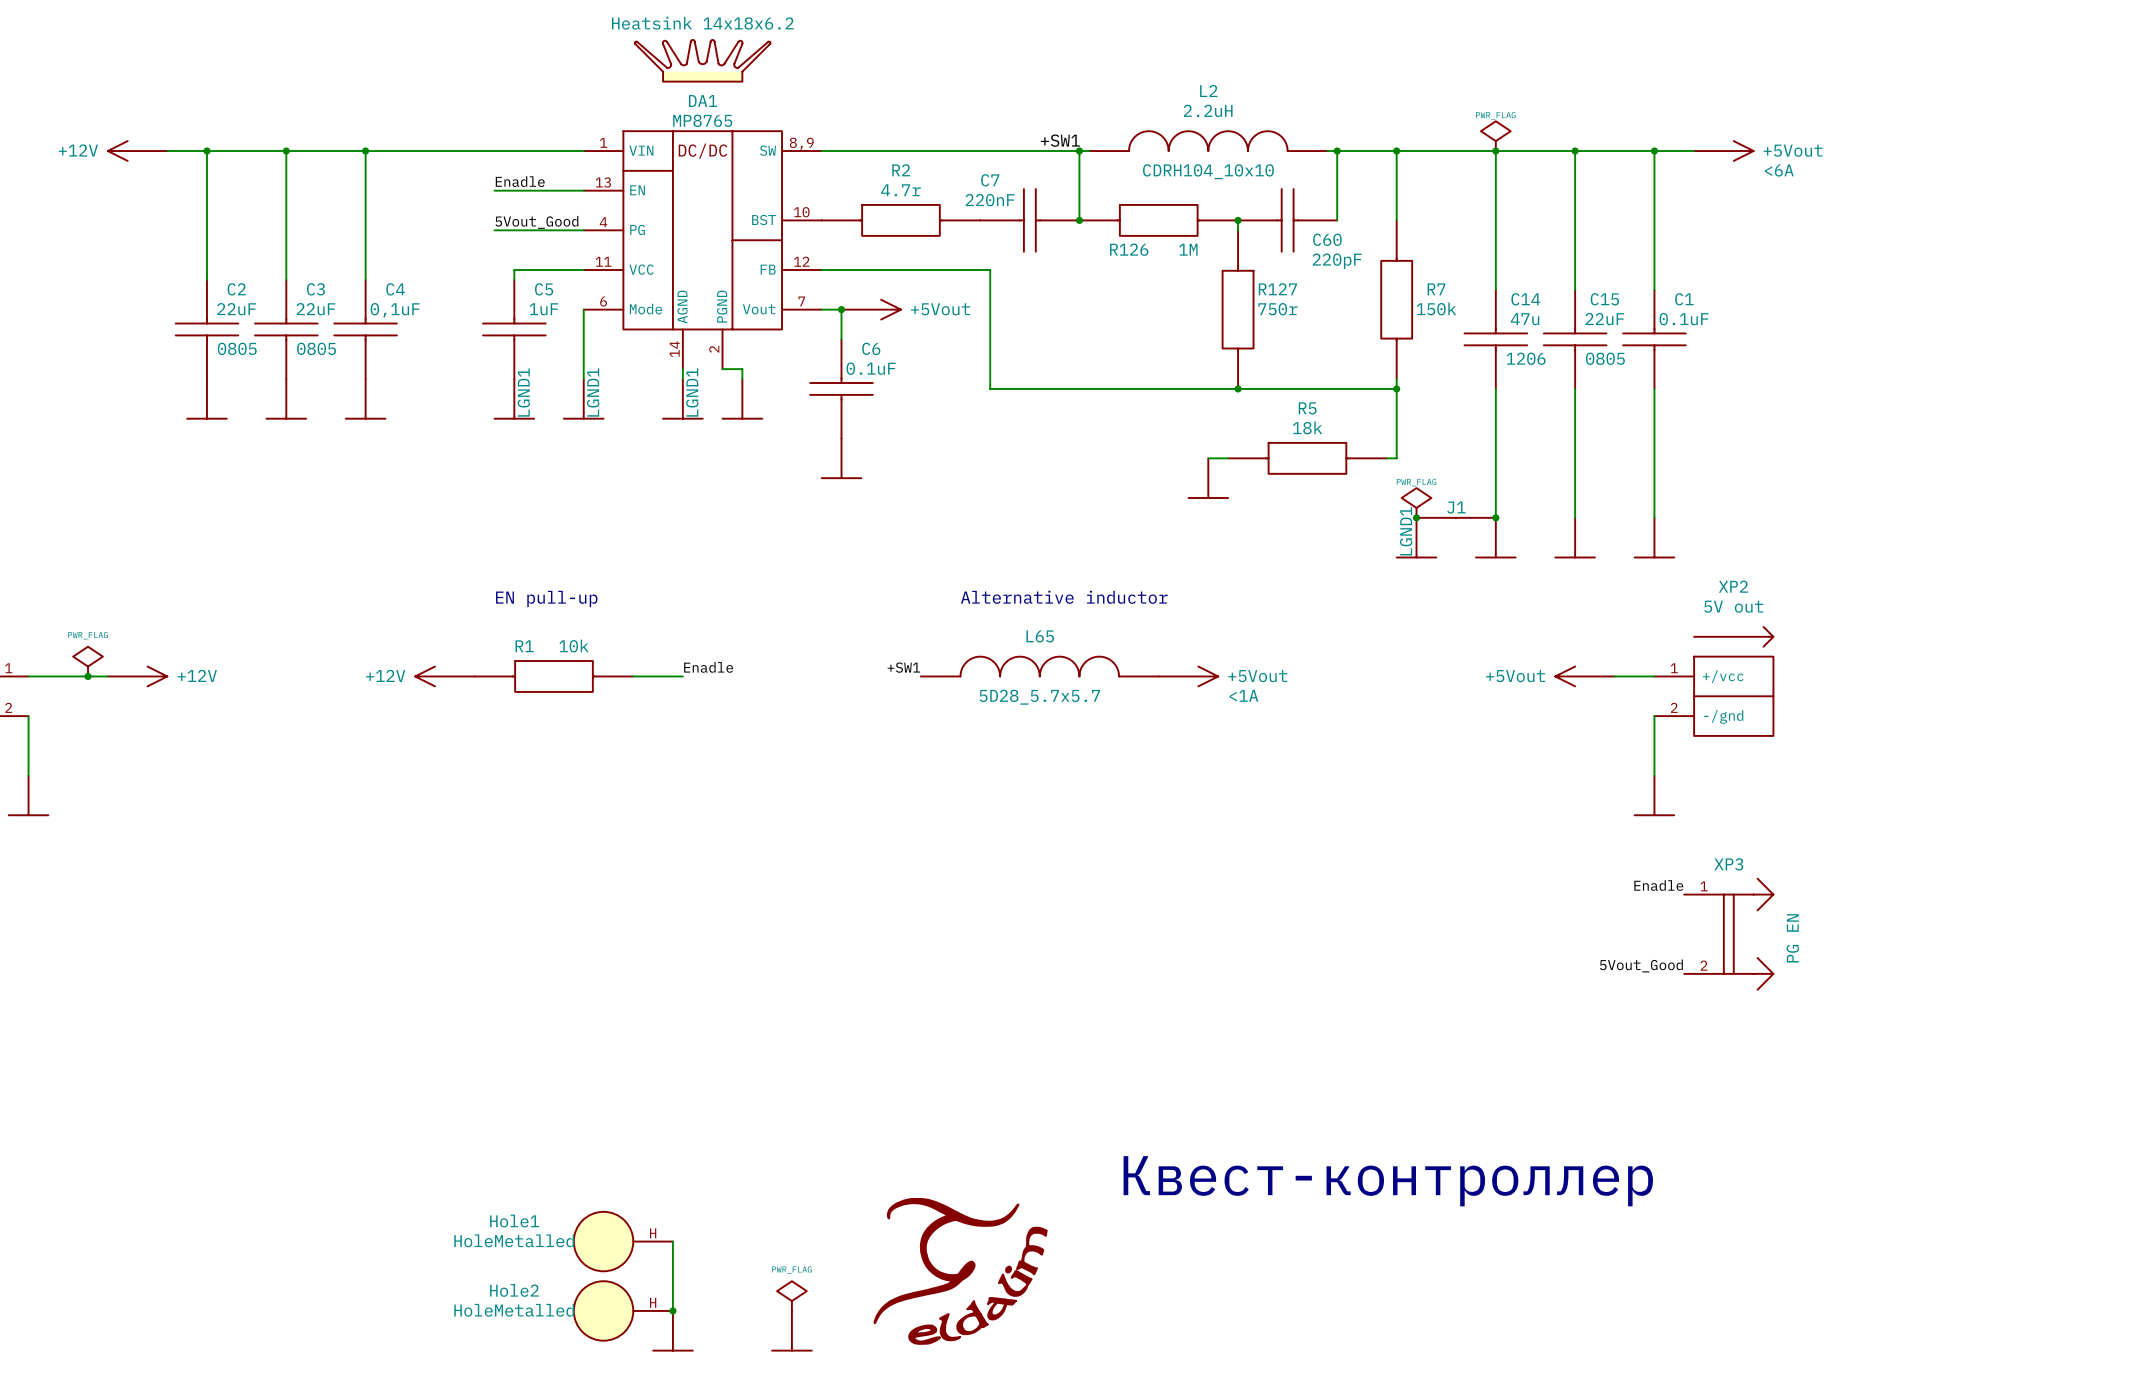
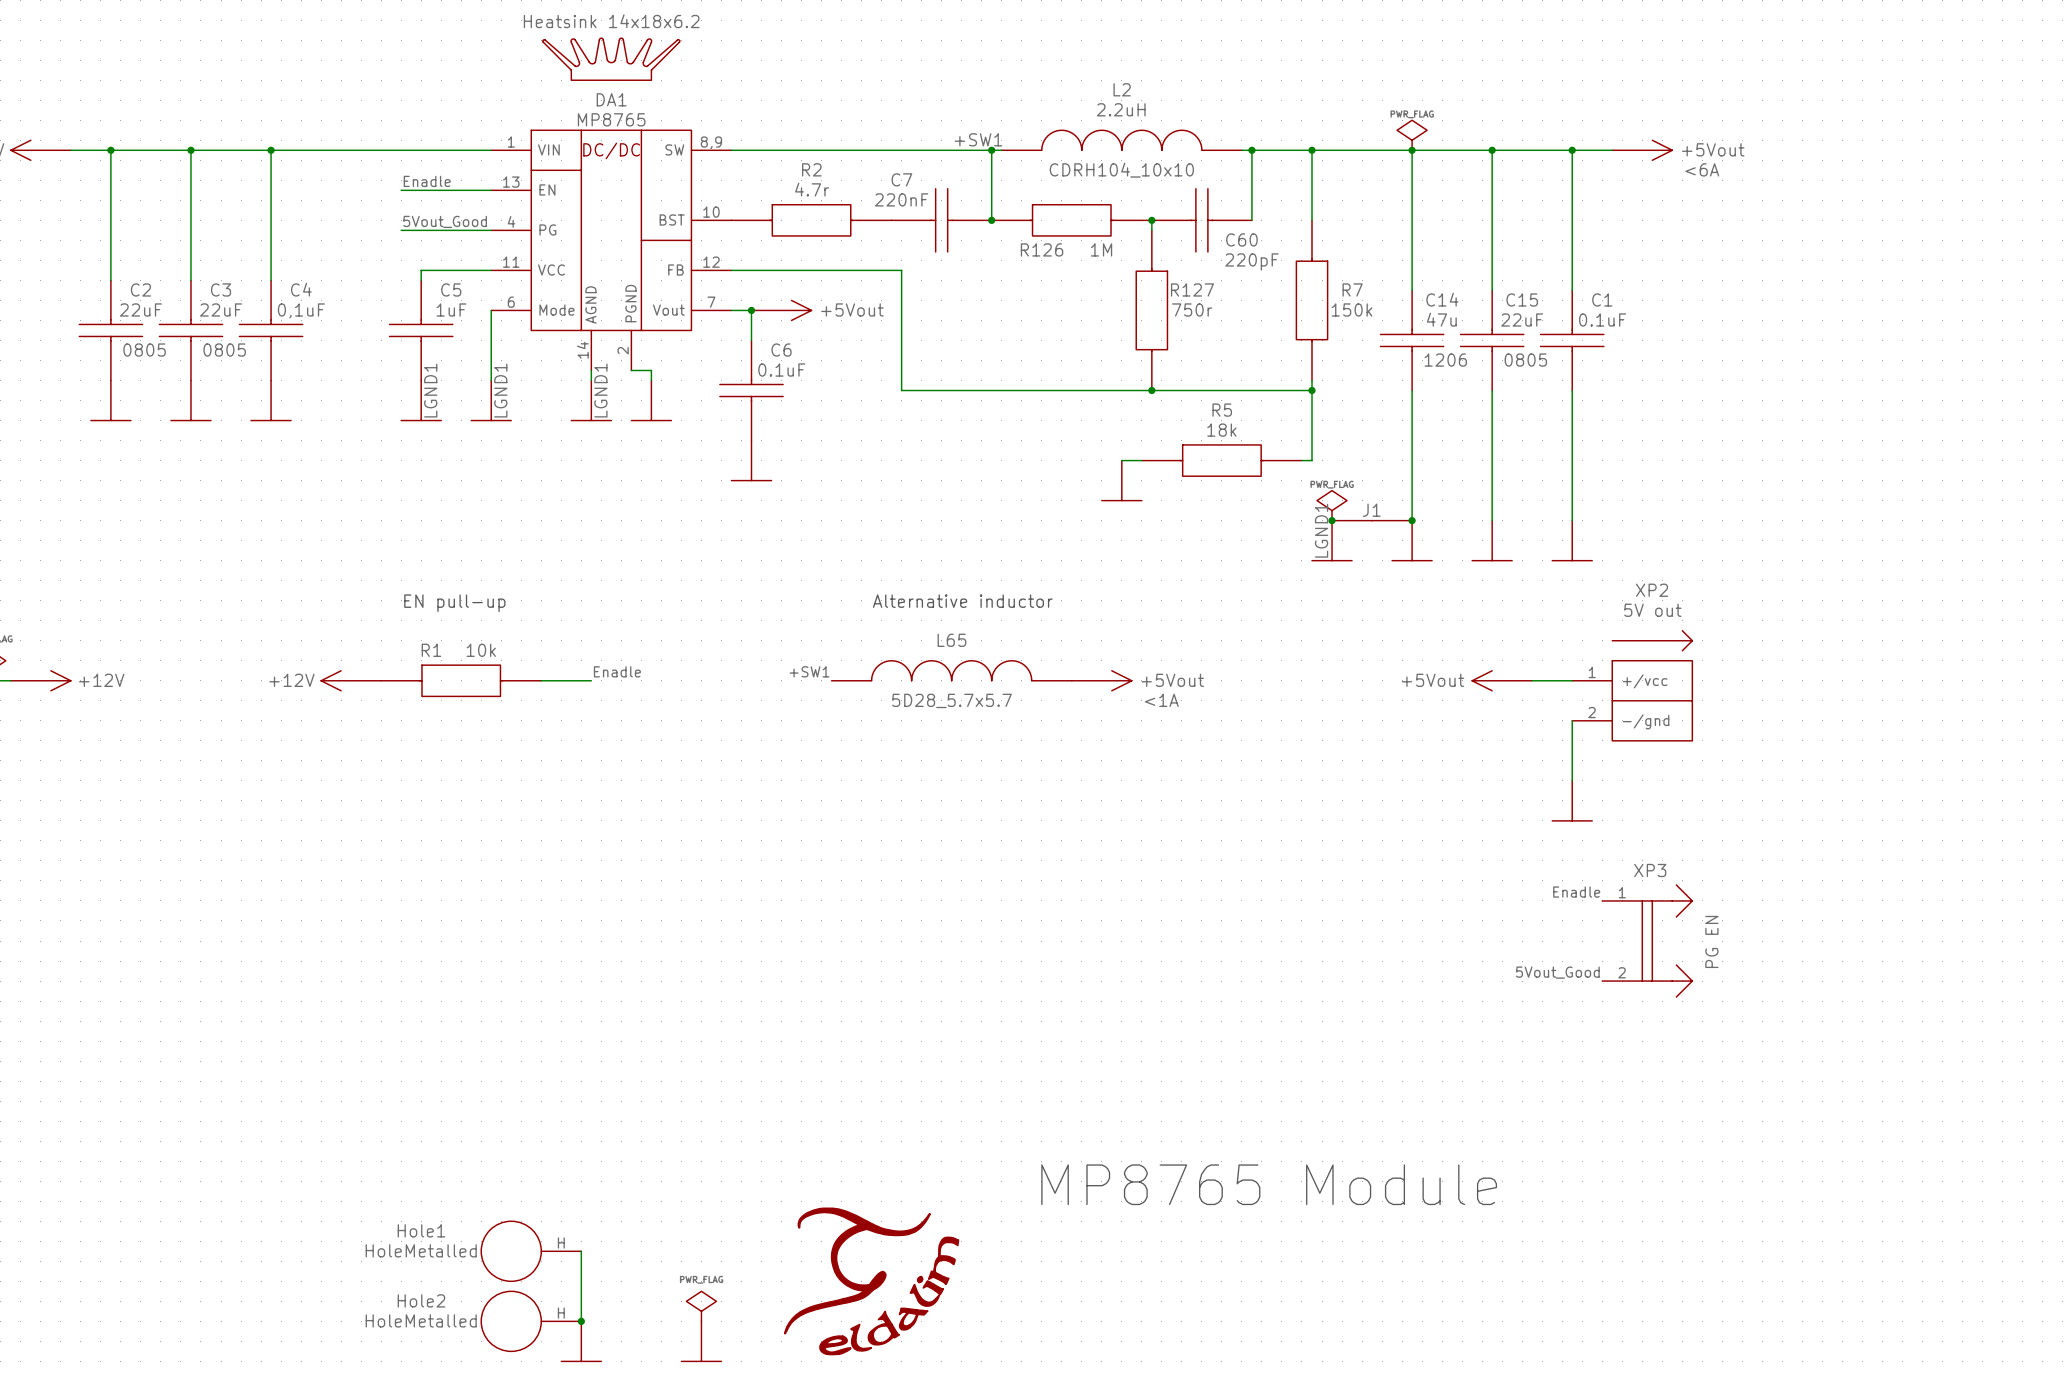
text: Квест-контроллер (1388, 1181) -> MP8765 Module (1269, 1184)

